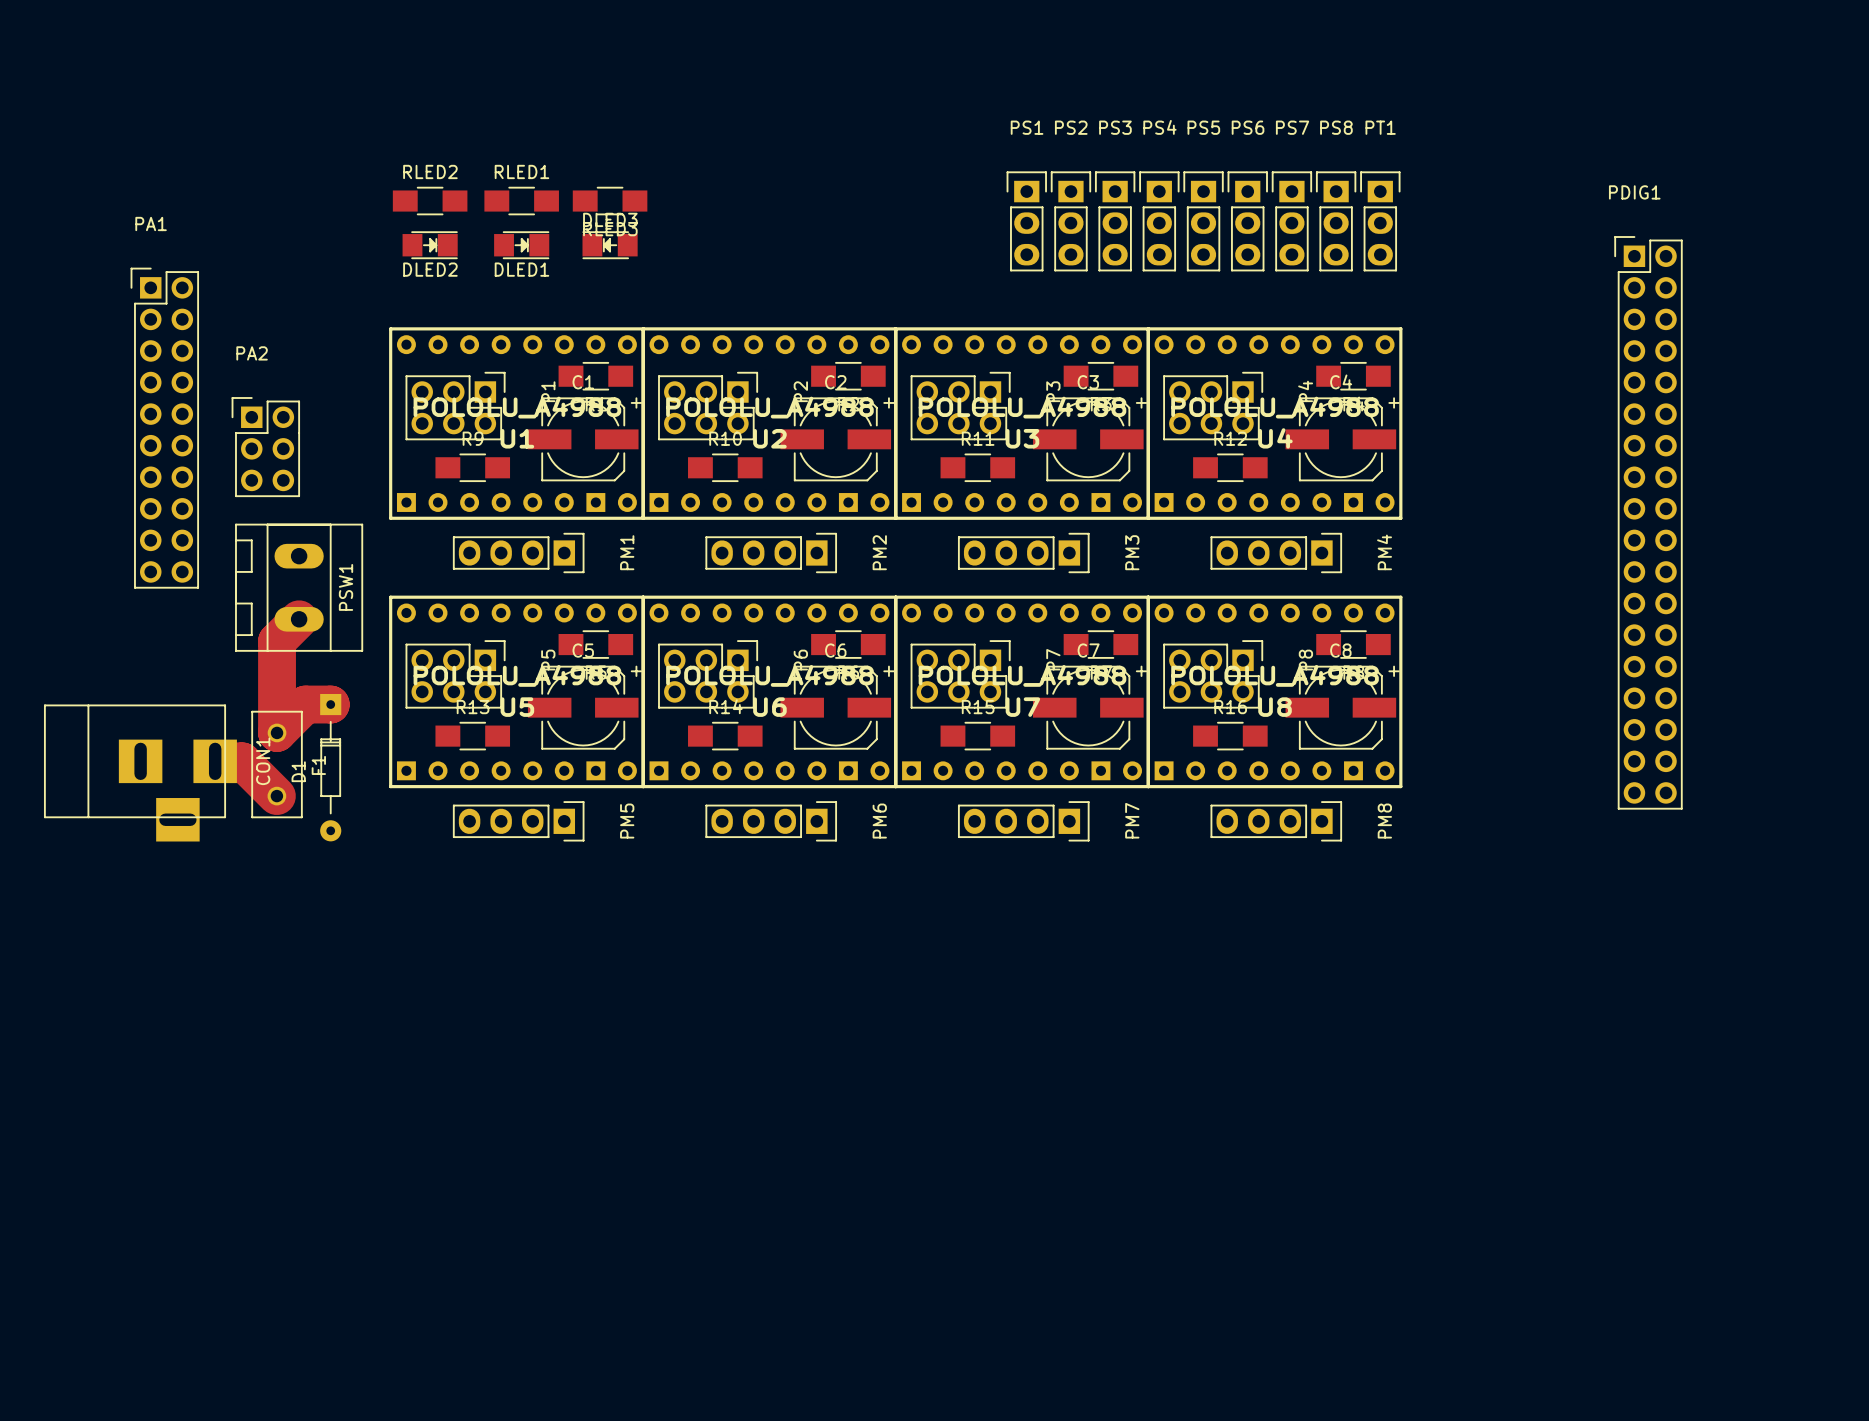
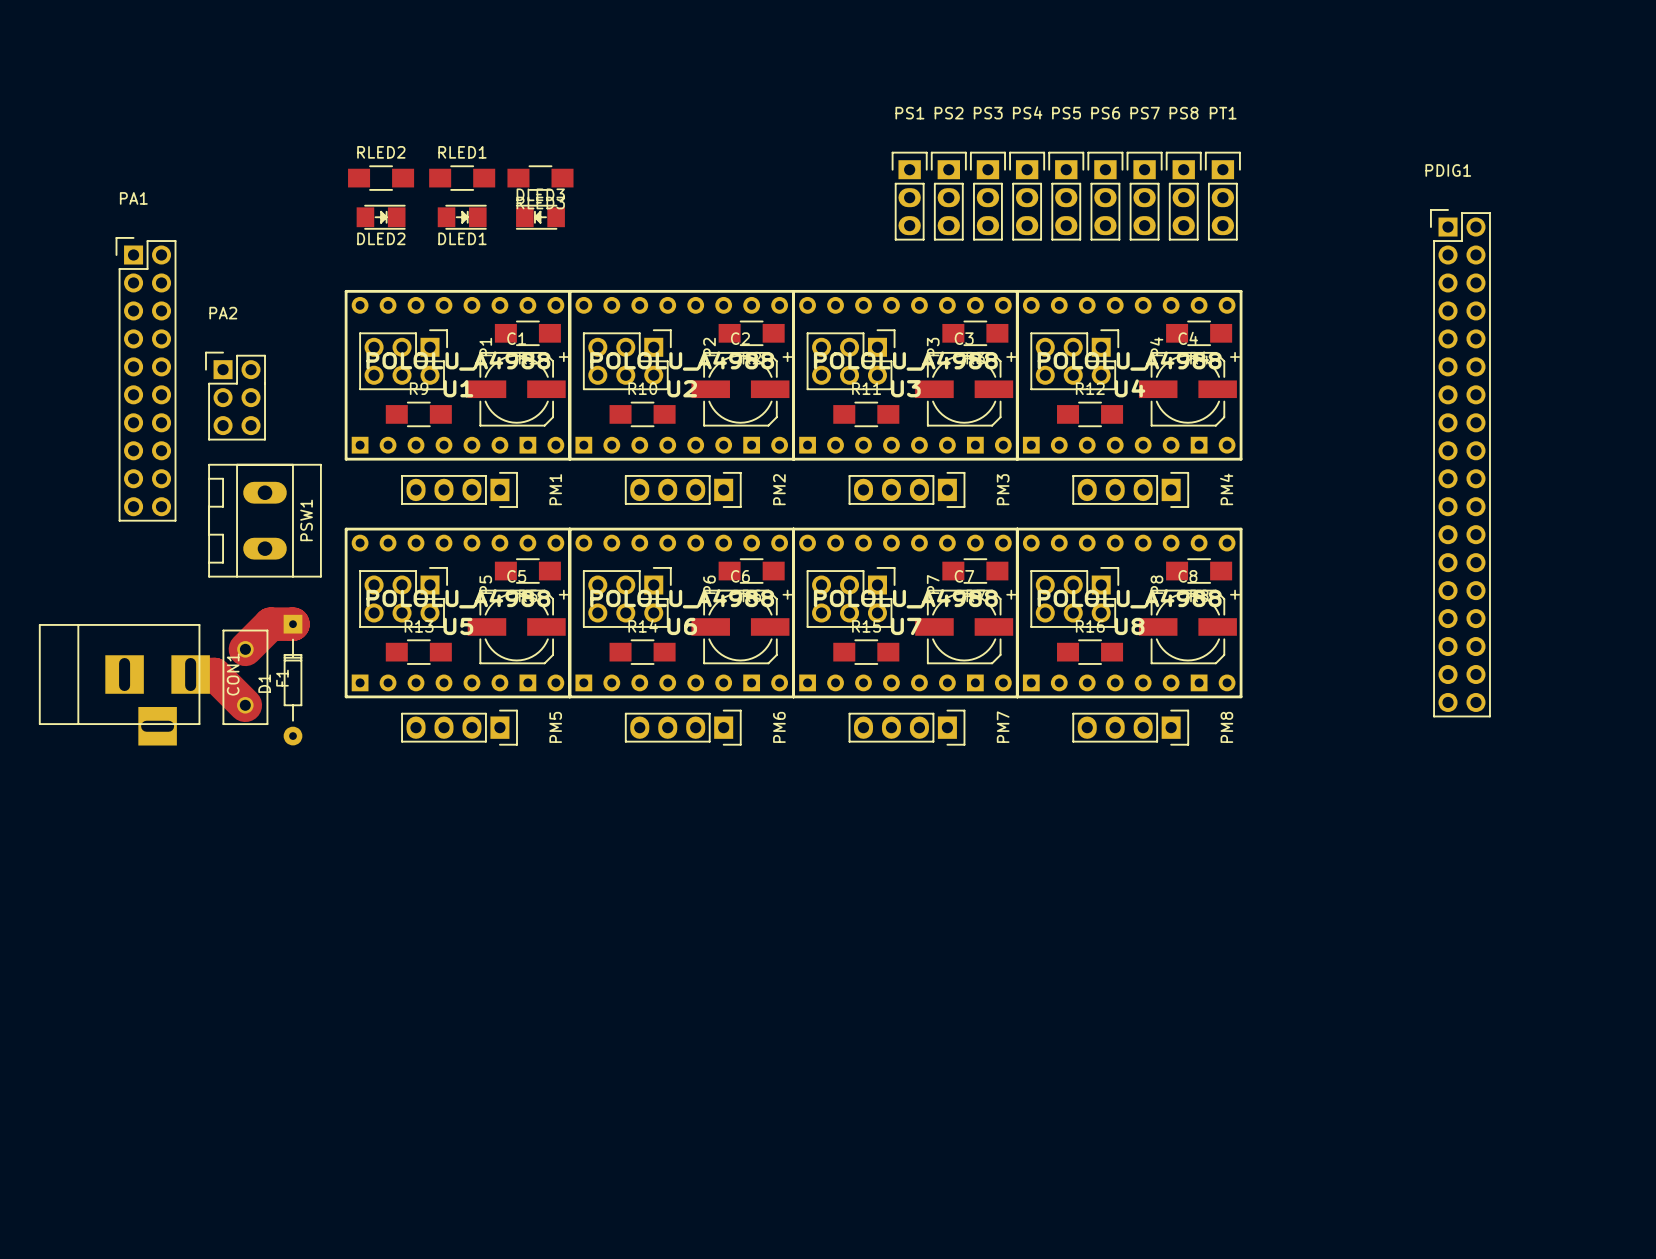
track: (299, 619) (277, 641) (277, 732) -> none

